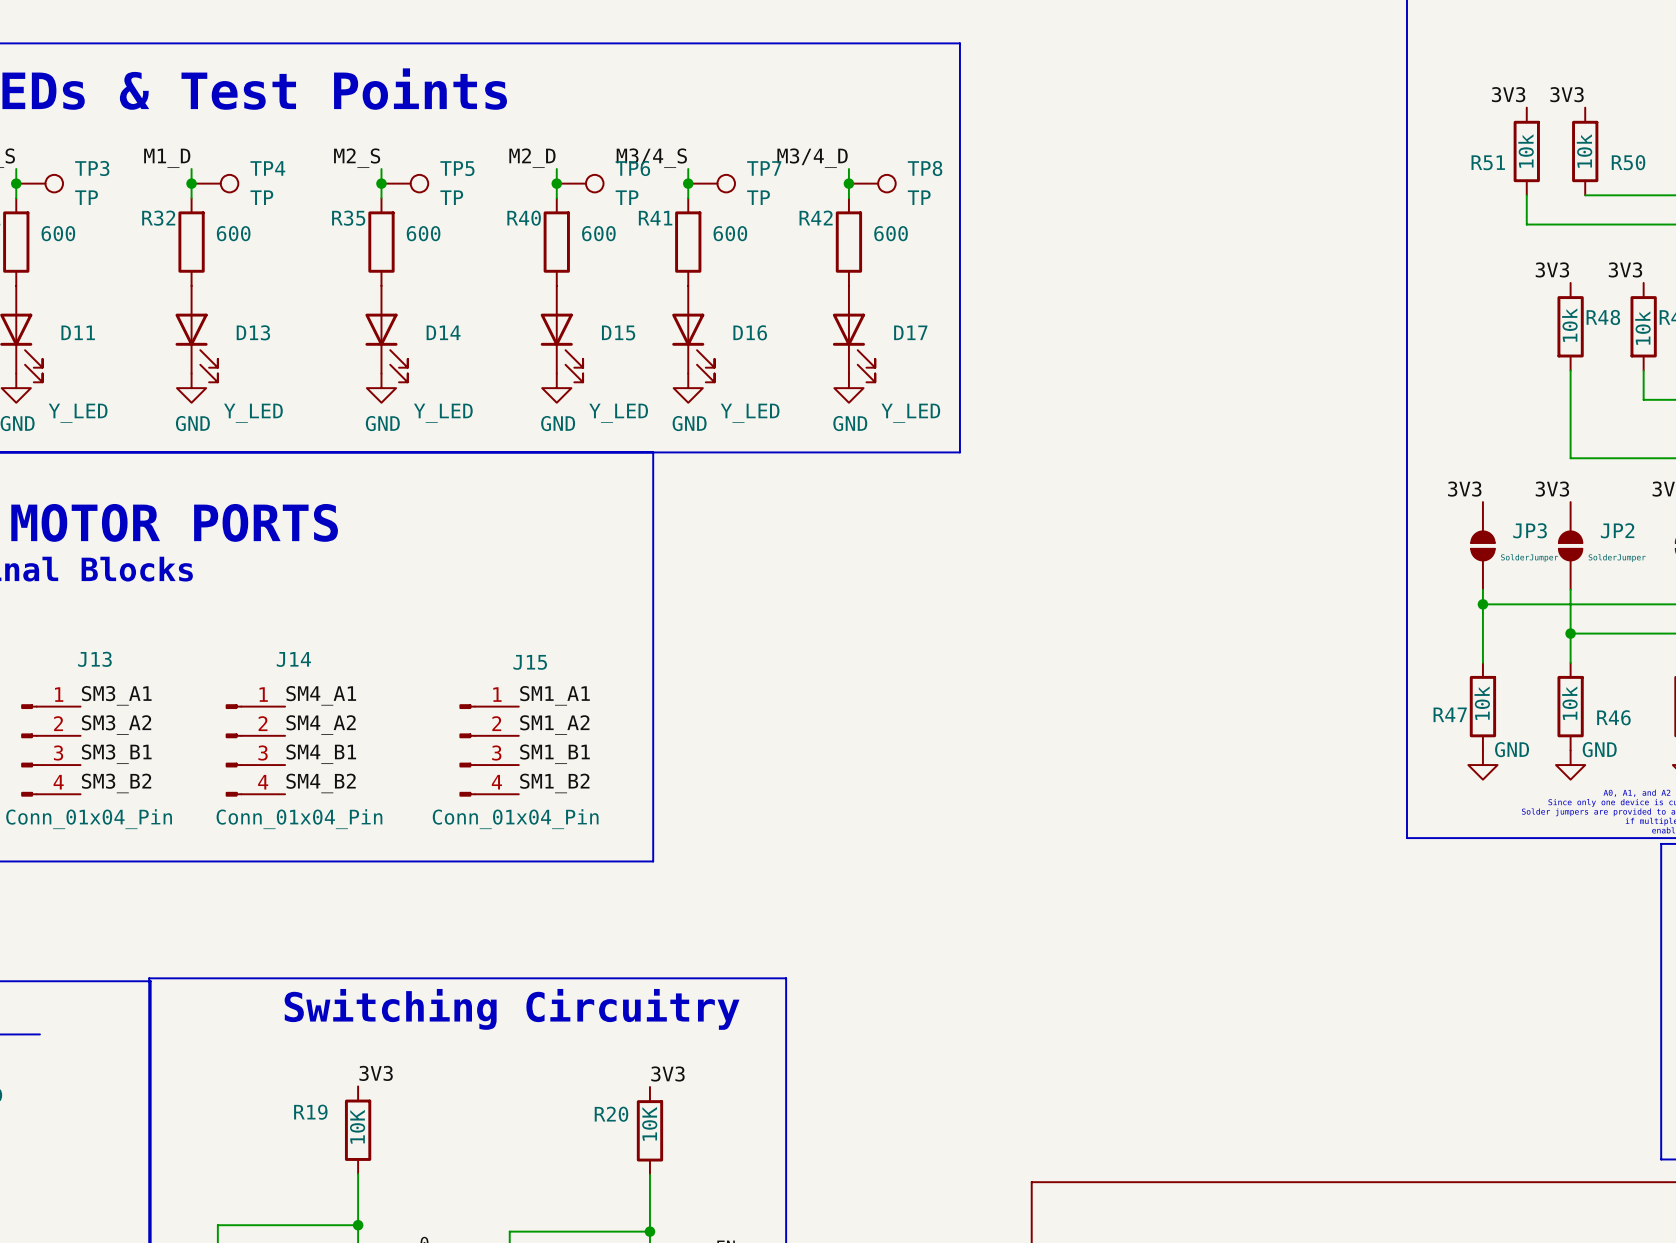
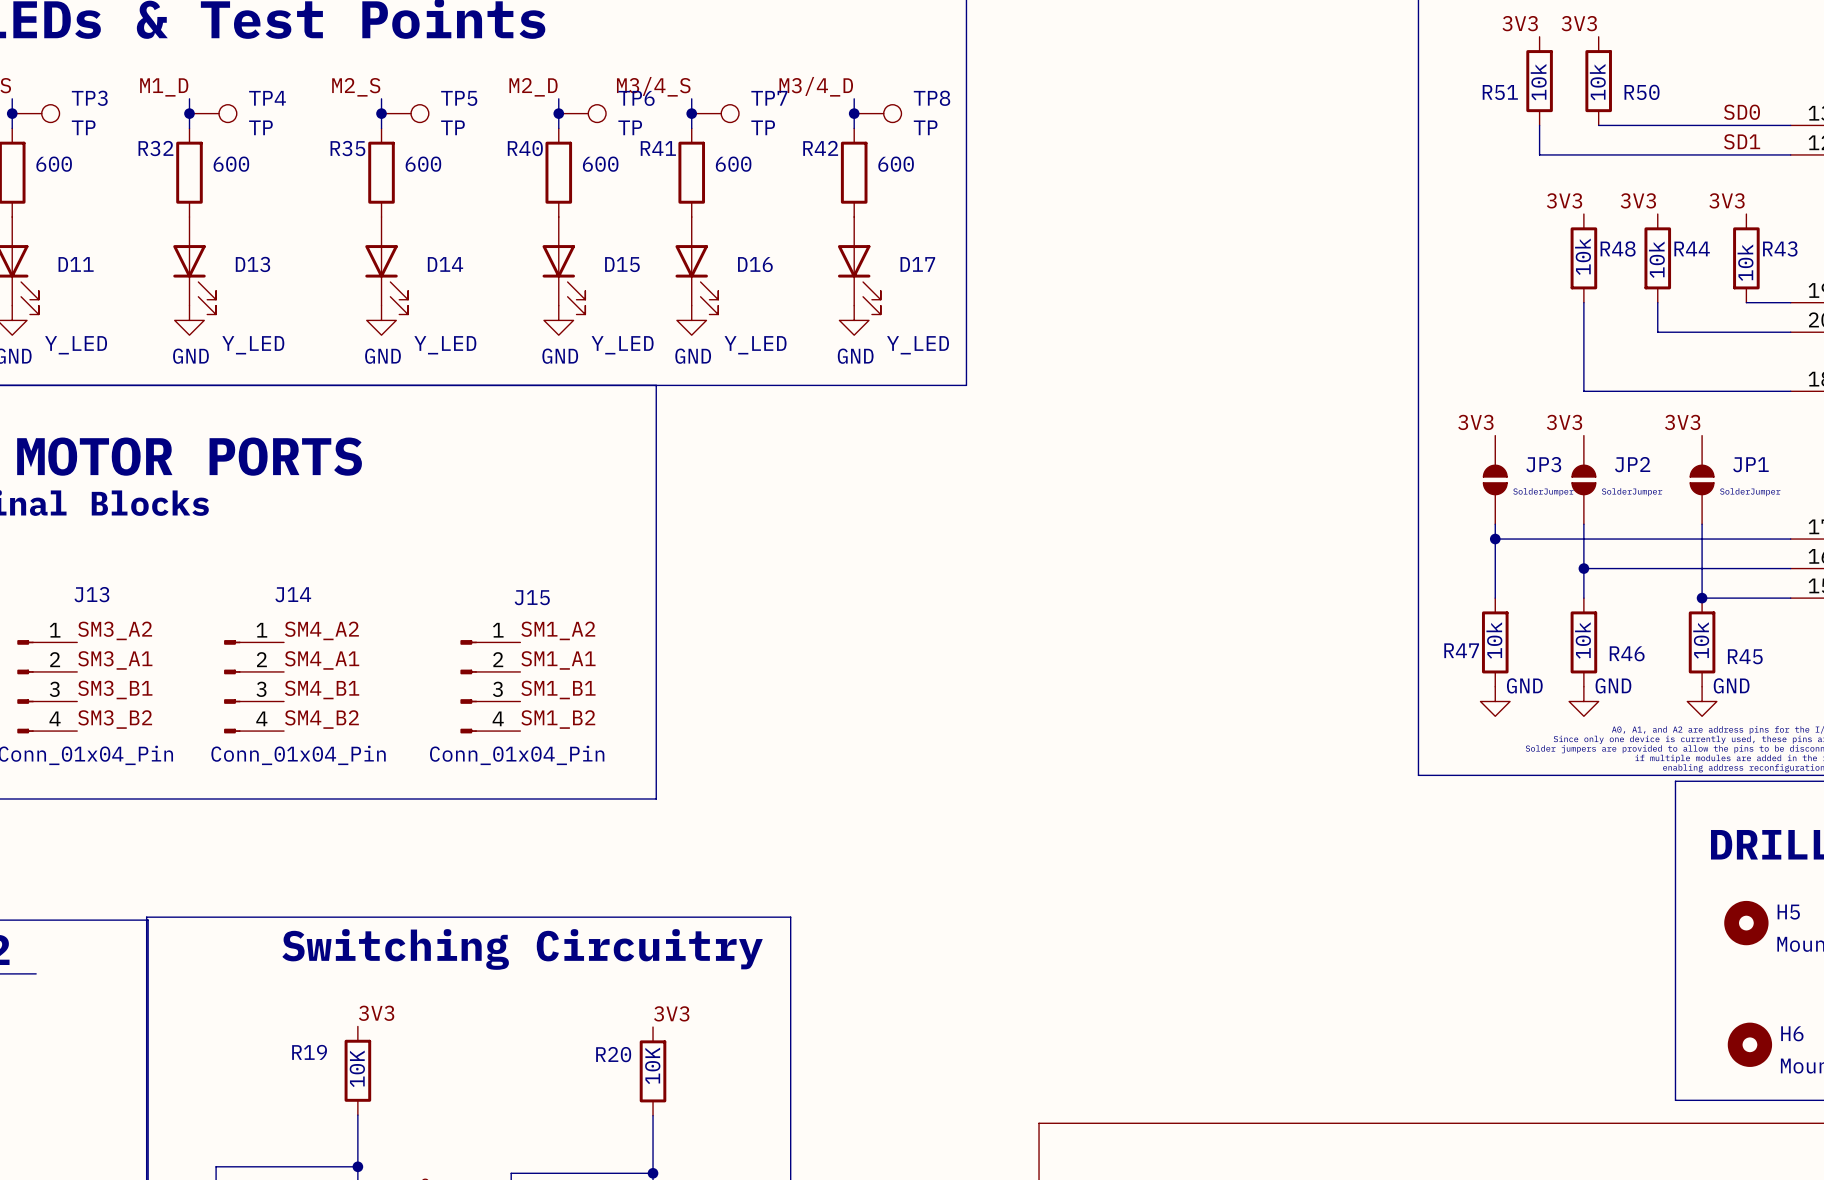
label: SM3_A1 (116, 695) -> SM3_A2 (115, 630)
label: SM4_A1 (321, 695) -> SM4_A2 (321, 630)
label: SM1_A1 (554, 695) -> SM1_A2 (558, 630)
label: SM3_A2 (116, 725) -> SM3_A1 (115, 660)
label: SM4_A2 (321, 725) -> SM4_A1 (322, 660)
label: SM1_A2 (554, 725) -> SM1_A1 (558, 660)

